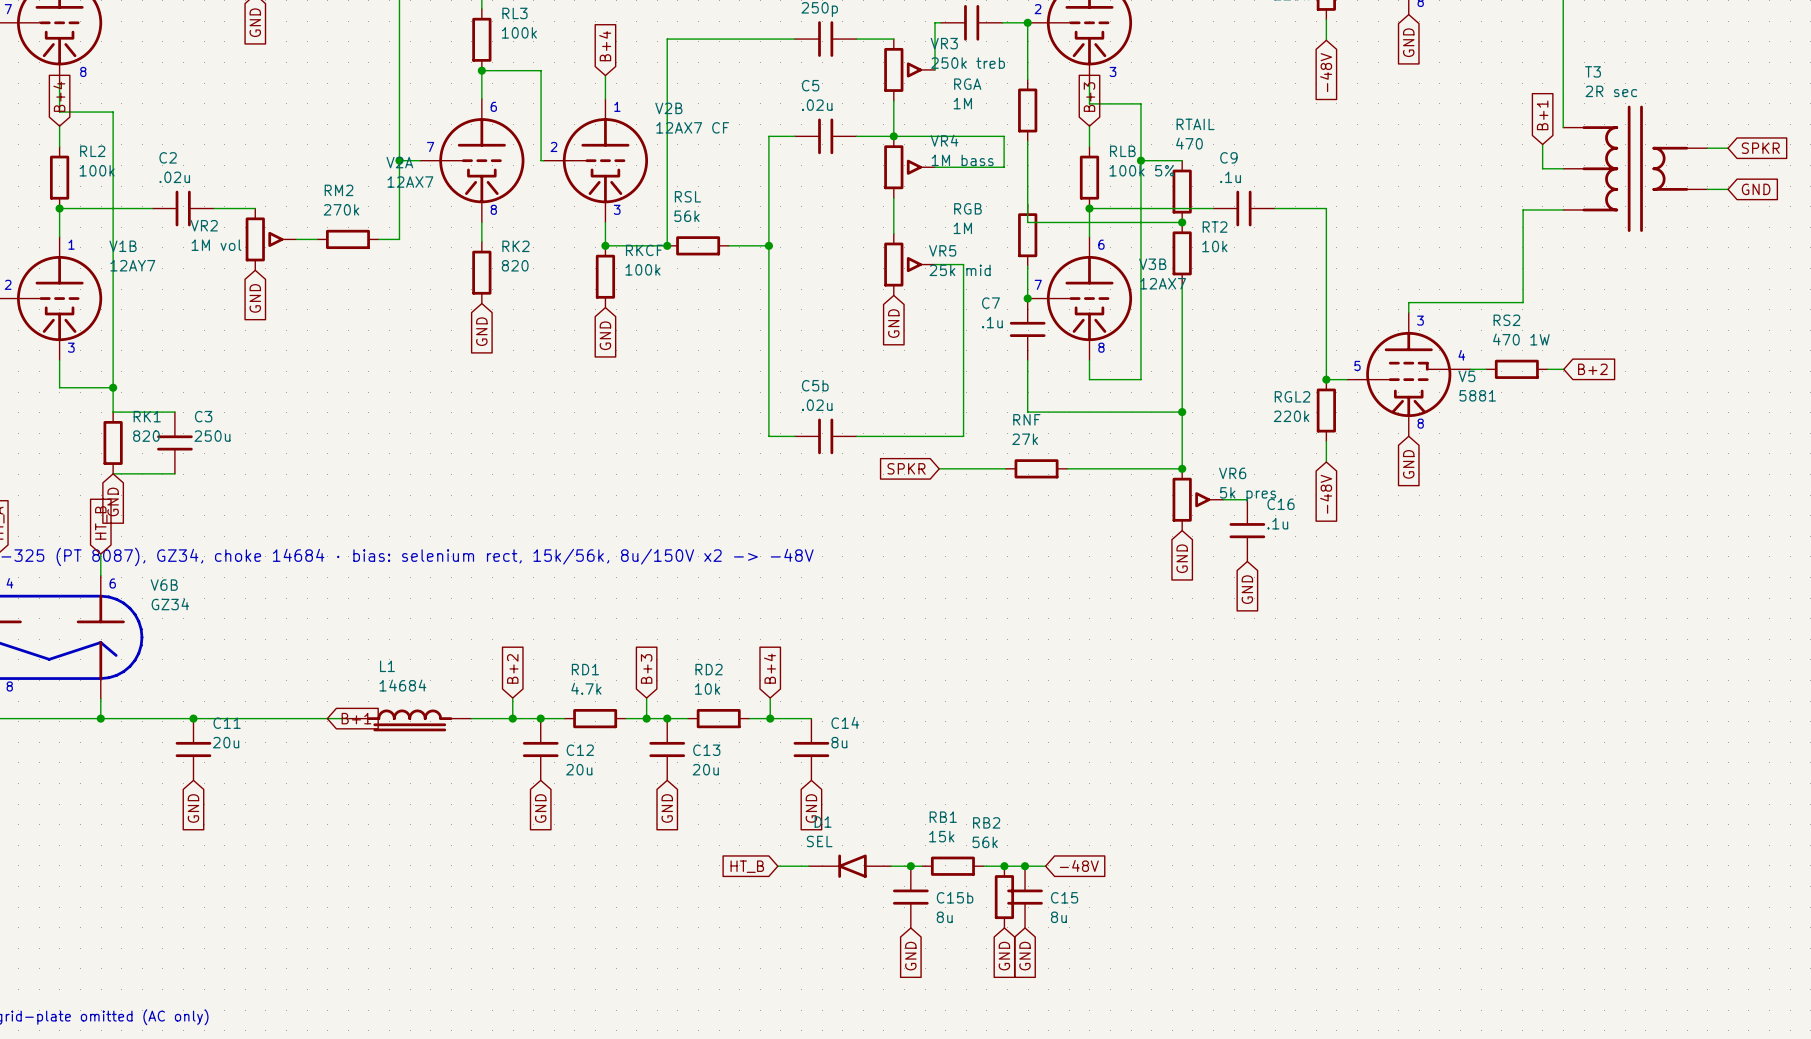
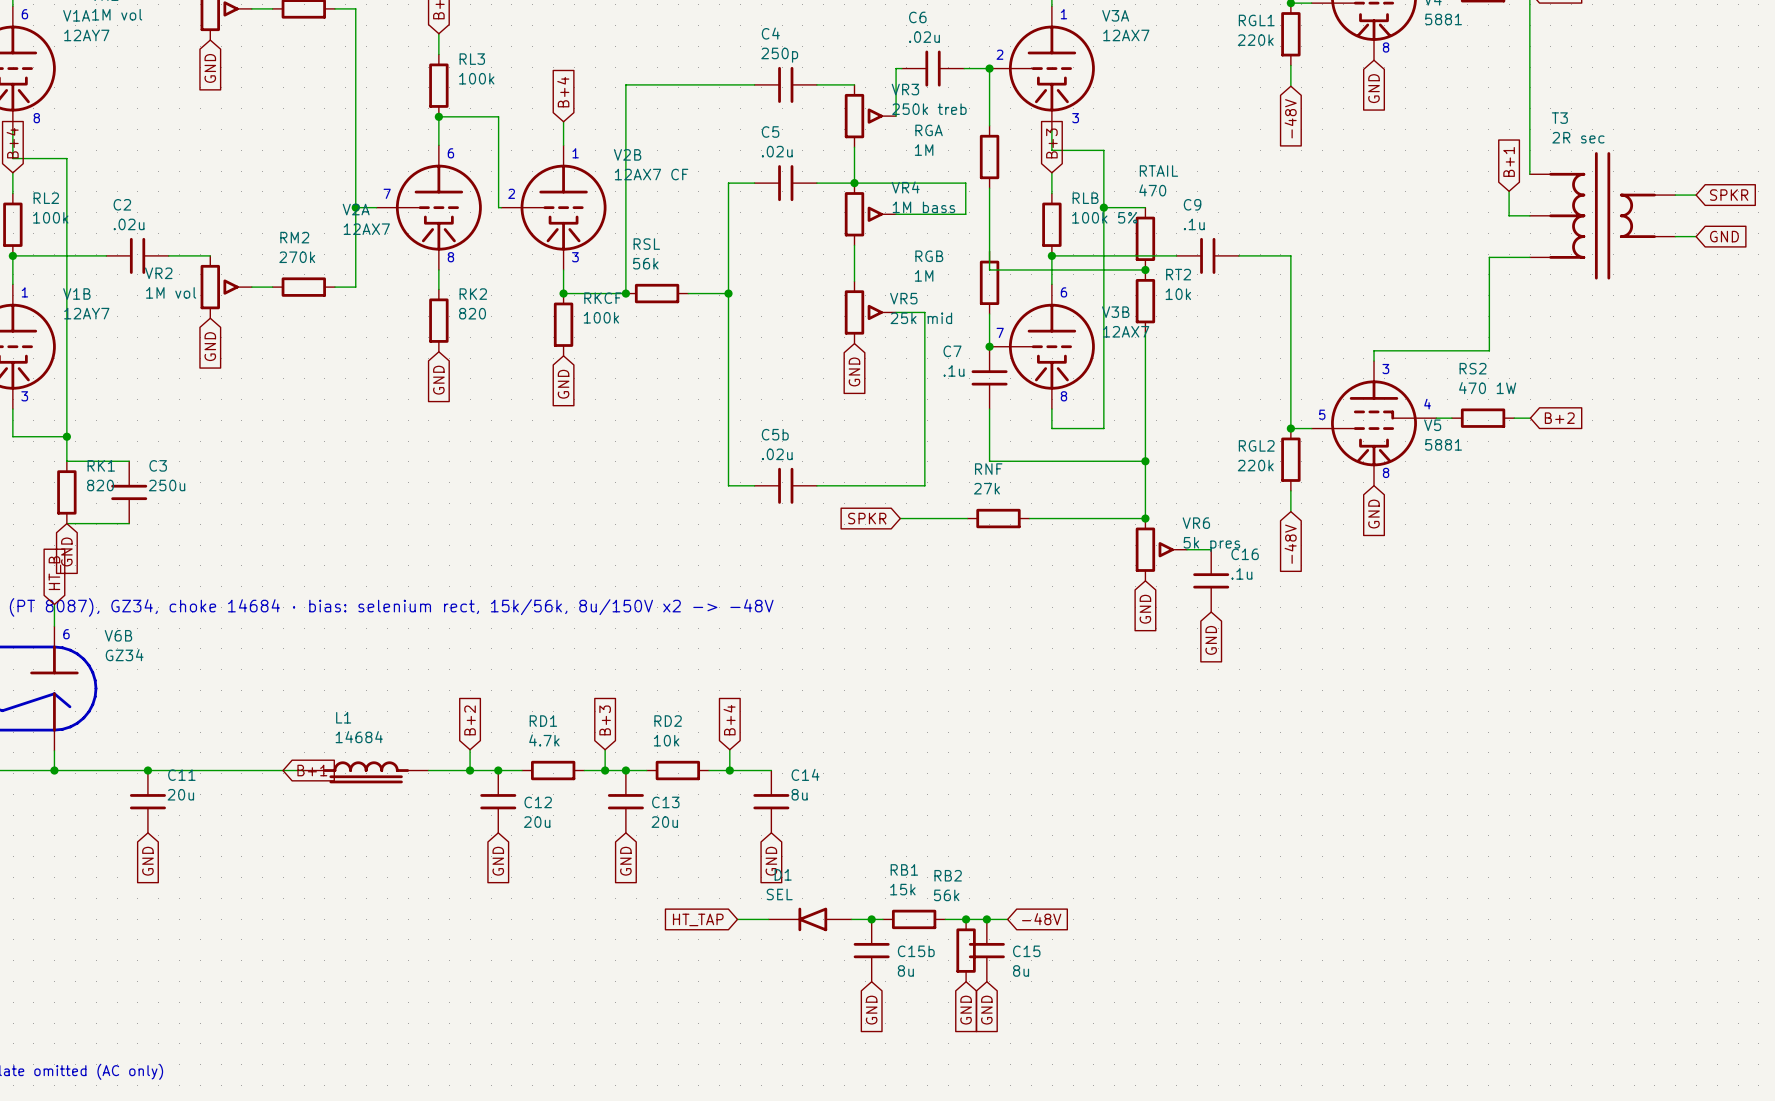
global label: HT_B (747, 866) -> HT_TAP (698, 919)

